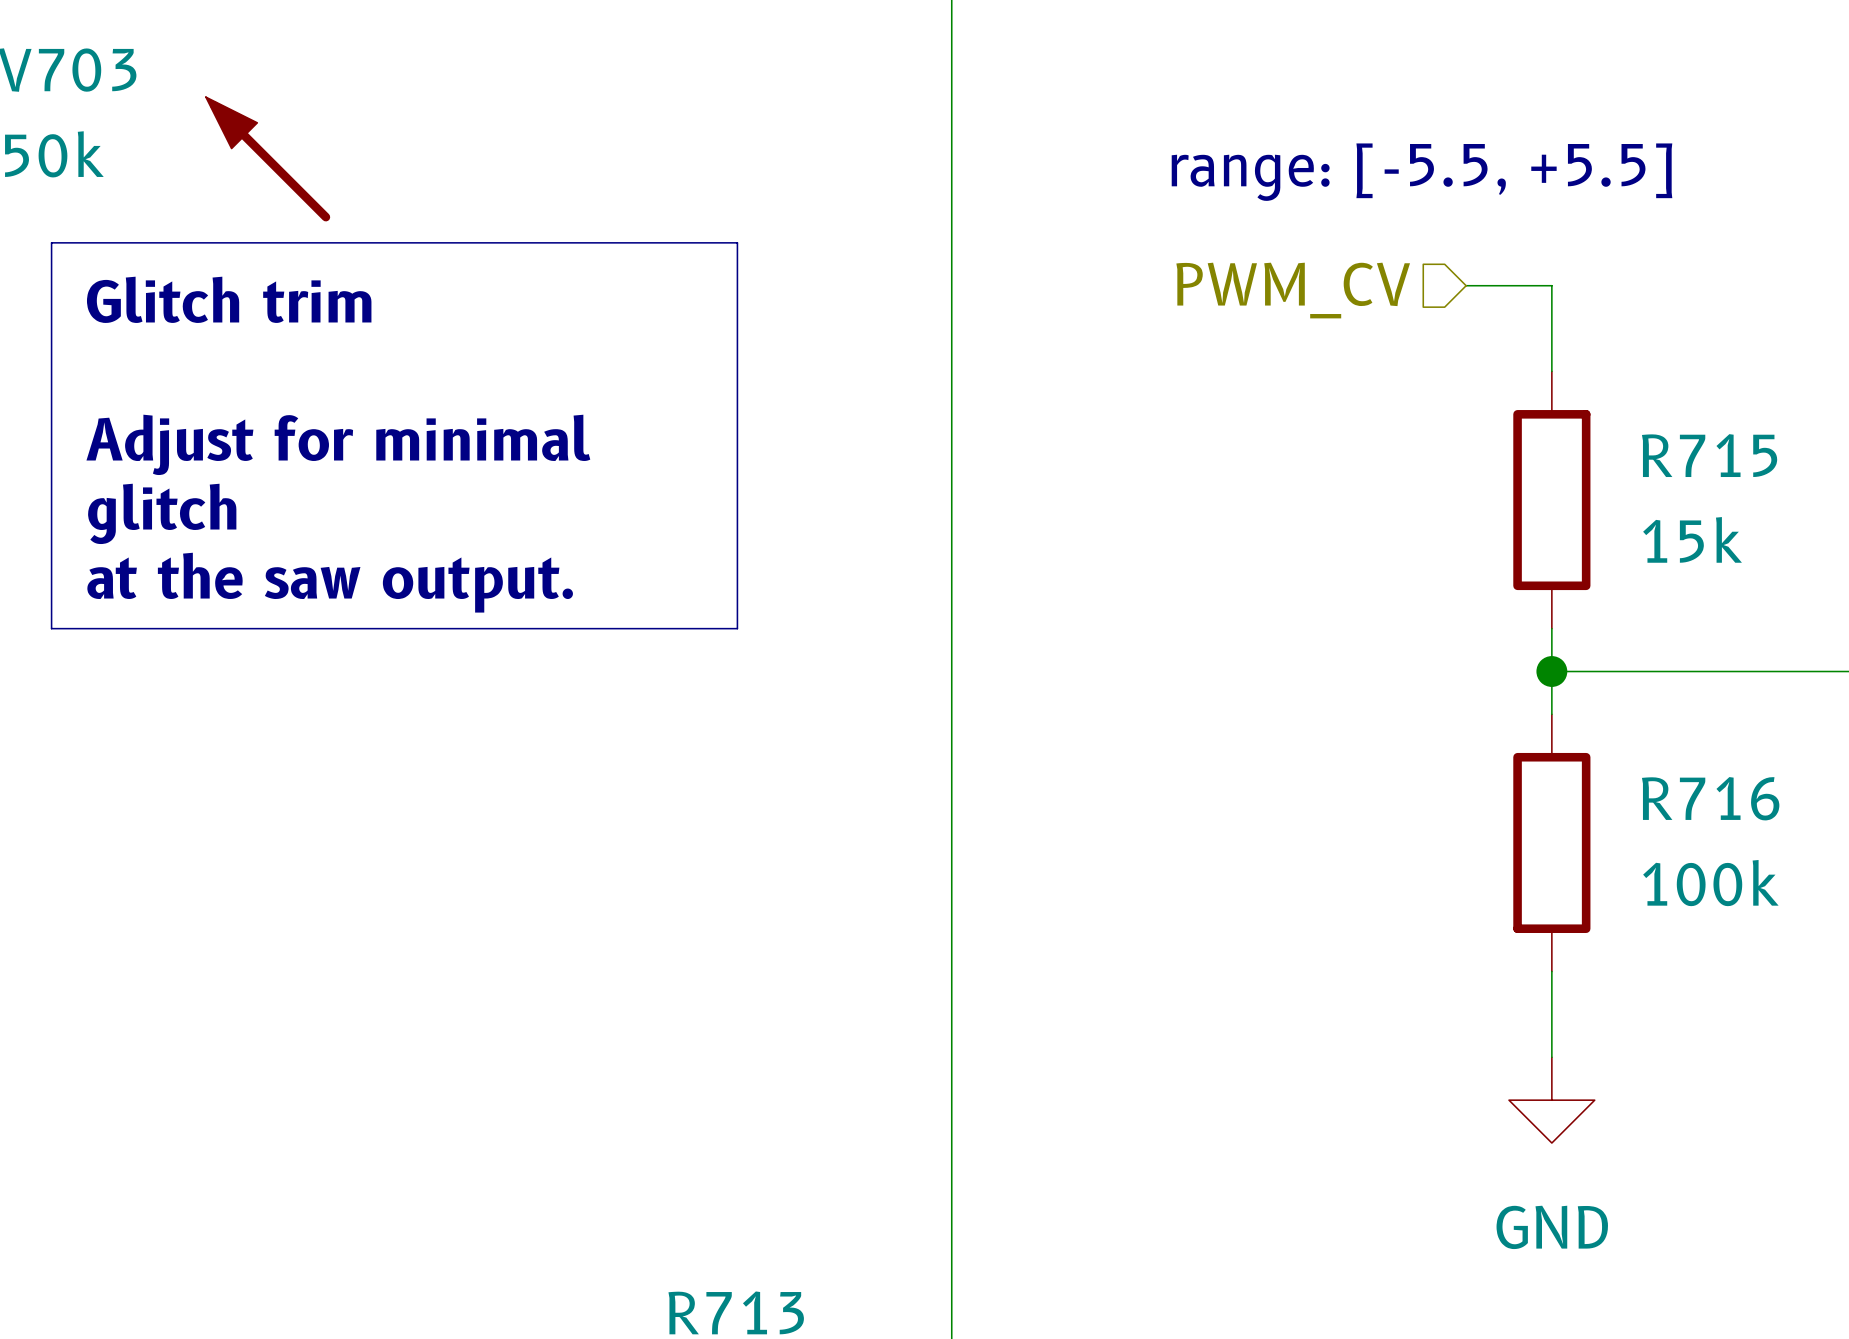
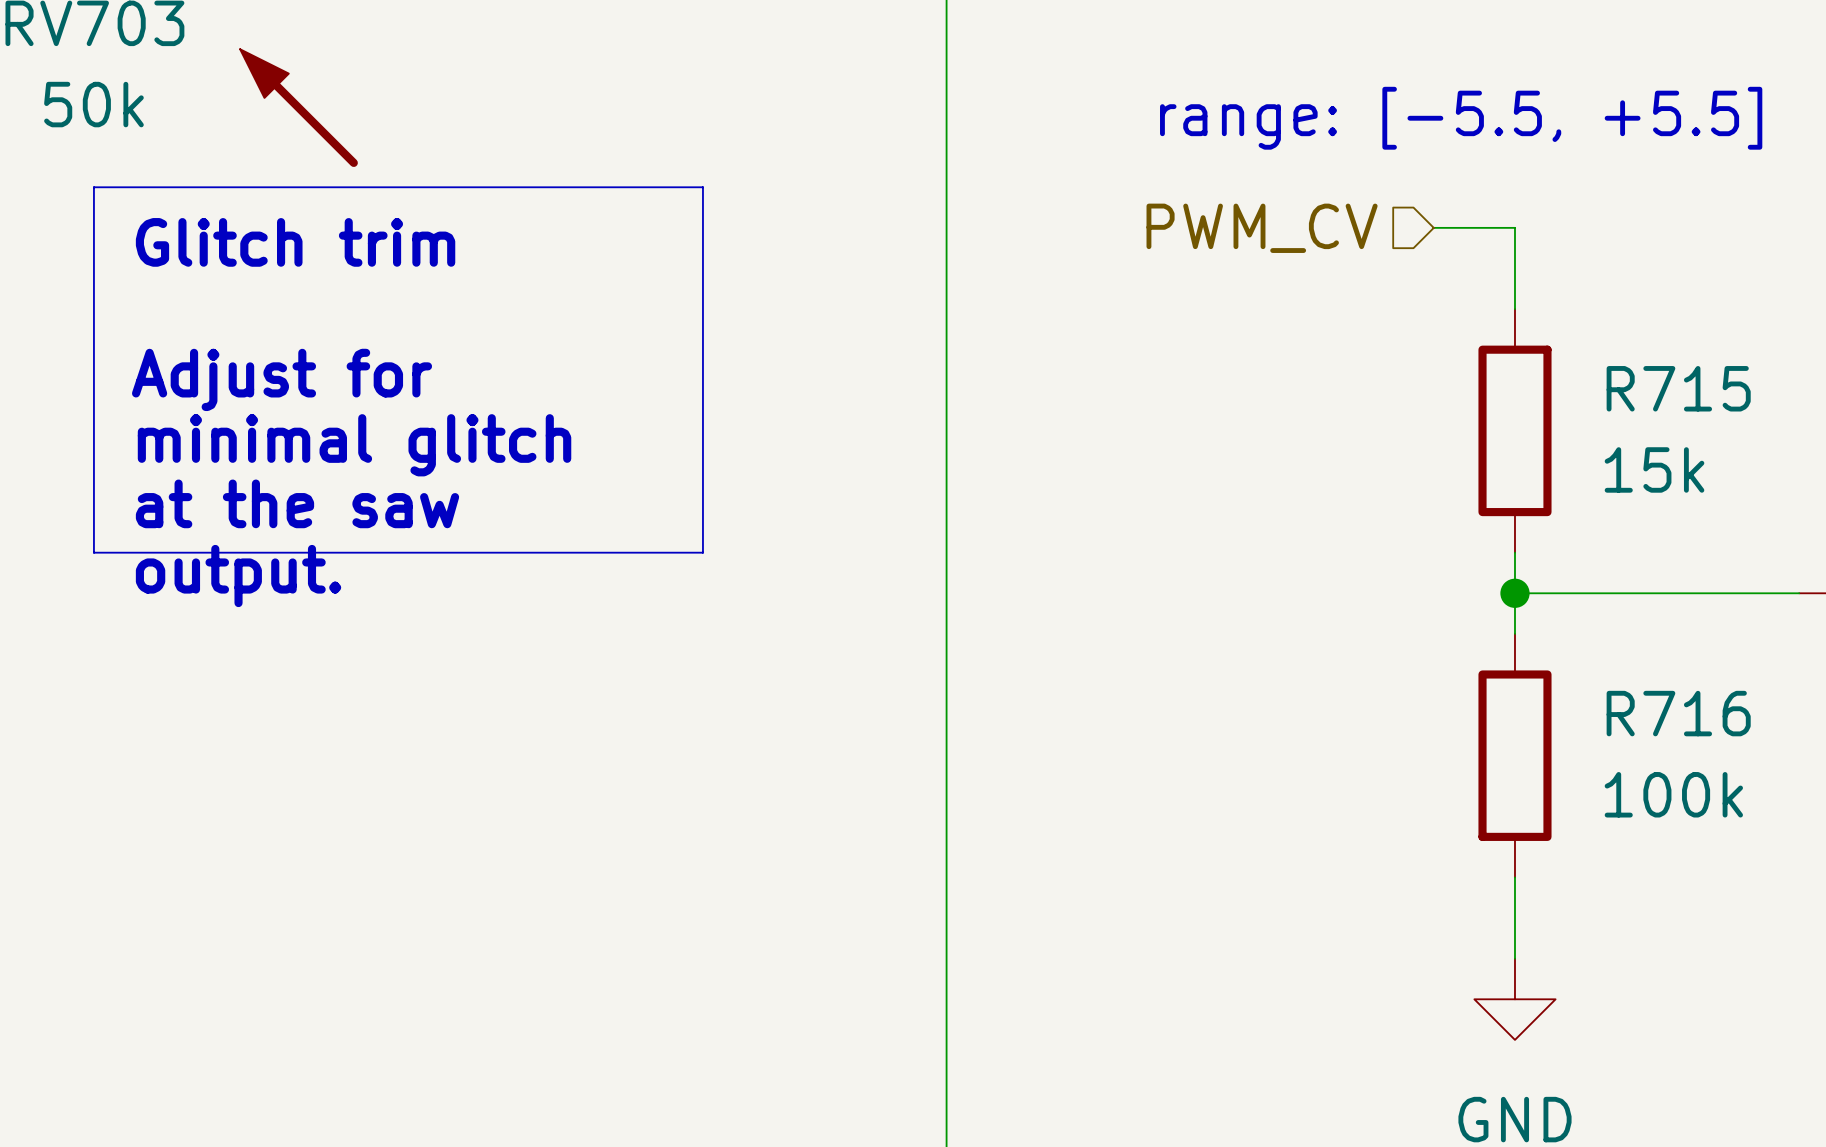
line: (694, 242) (737, 242) (737, 628) (694, 628) -> (702, 187) (702, 552)
text: Adjust for minimal (338, 444) -> Adjust for (282, 379)
text: glitch (162, 513) -> minimal glitch (354, 445)
text: at the saw output. (330, 582) -> at the saw (297, 503)
text: none -> output. (238, 576)

